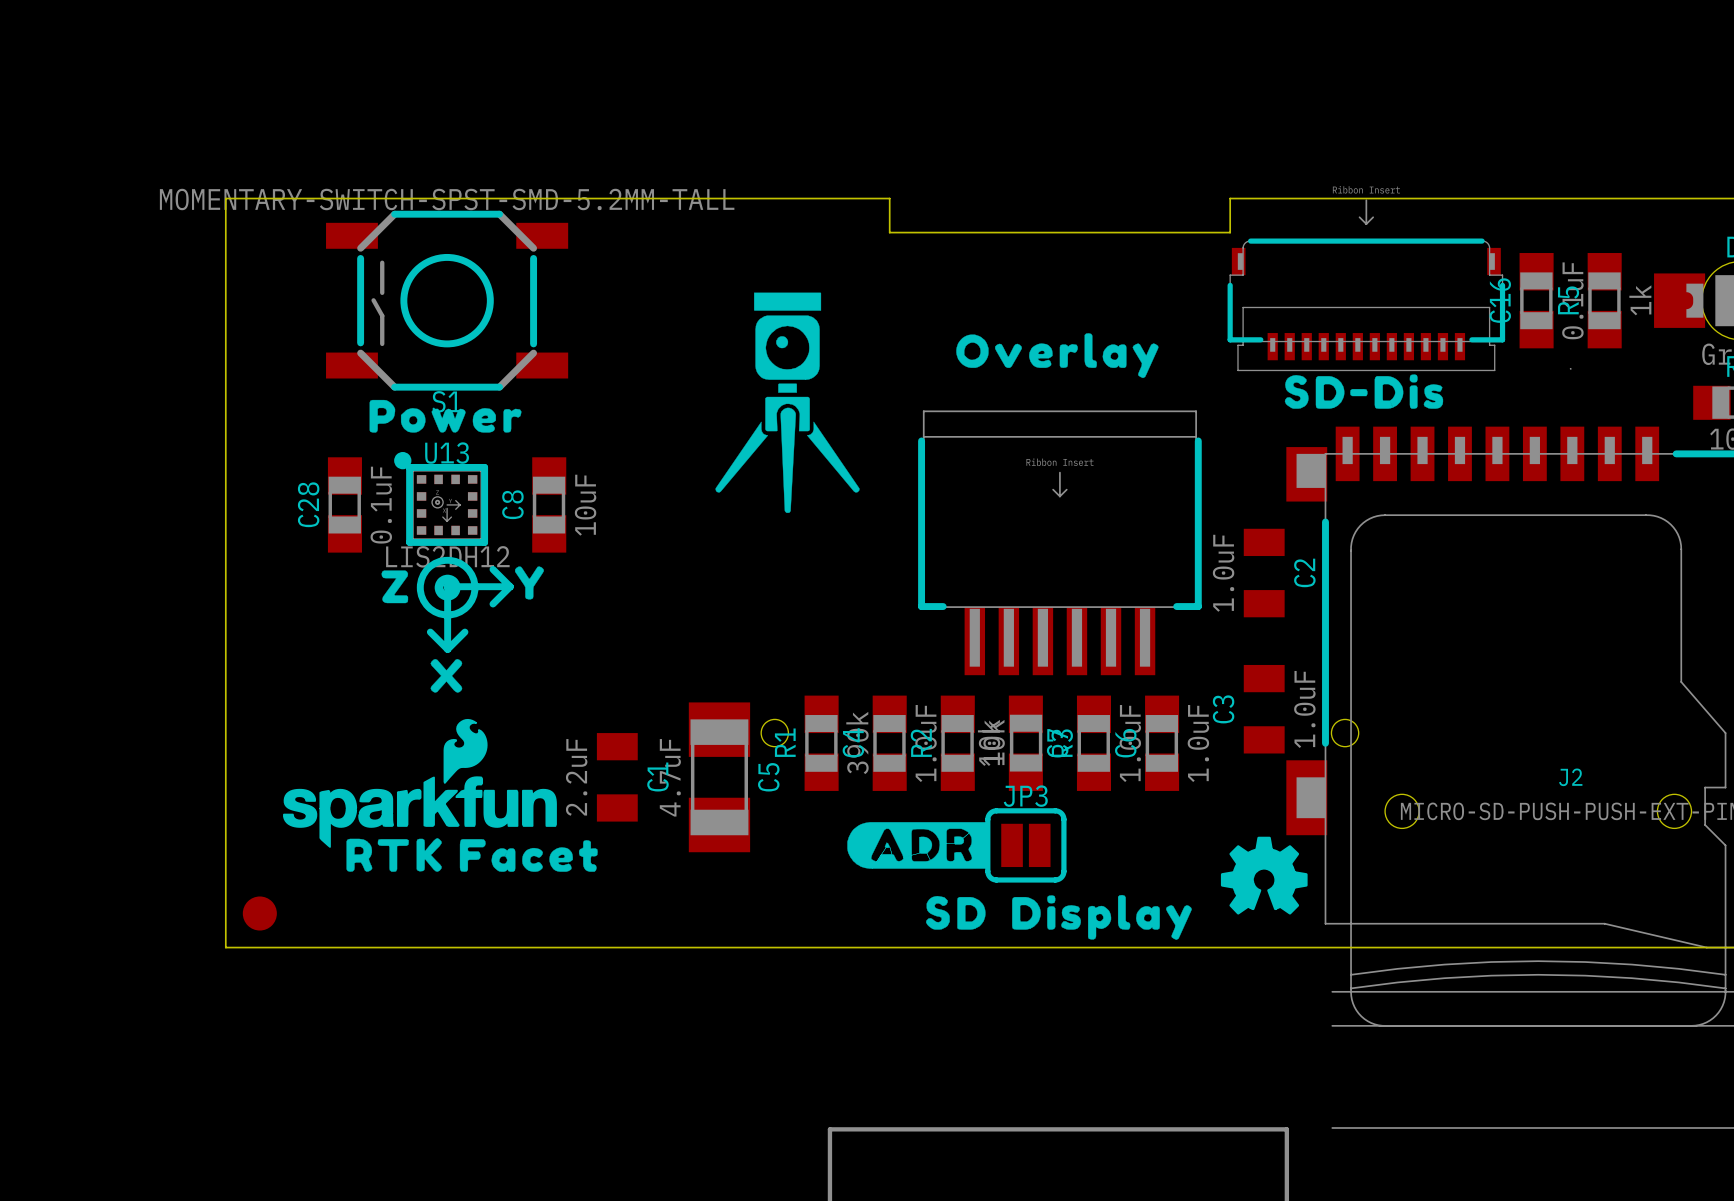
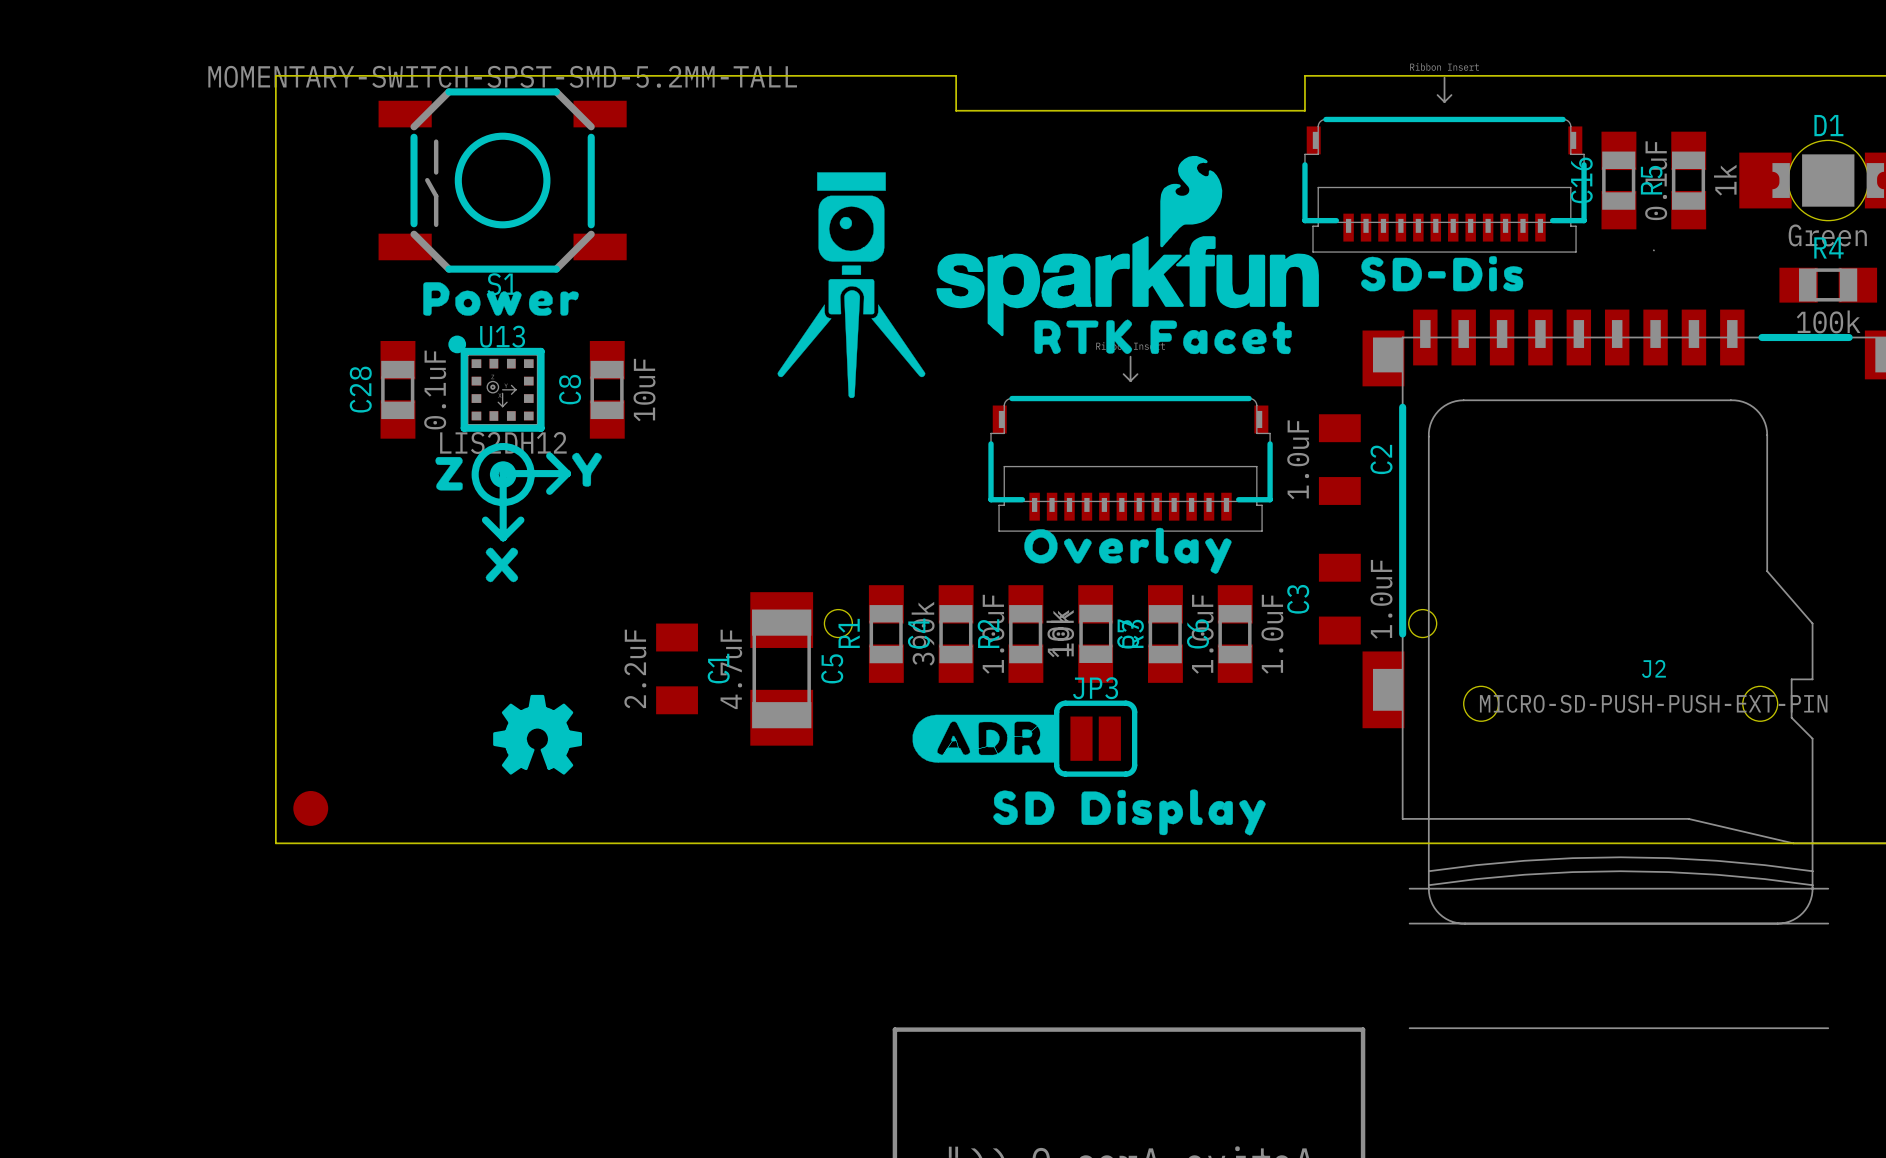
drawing: none -> [936, 155, 1319, 337]
drawing position: (1057, 355) -> (1127, 550)
part footprint: [918, 410, 1202, 676] -> [988, 355, 1273, 532]
drawing: [283, 718, 557, 848] -> none
drawing position: (472, 854) -> (1163, 336)
drawing position: (1264, 875) -> (537, 734)

